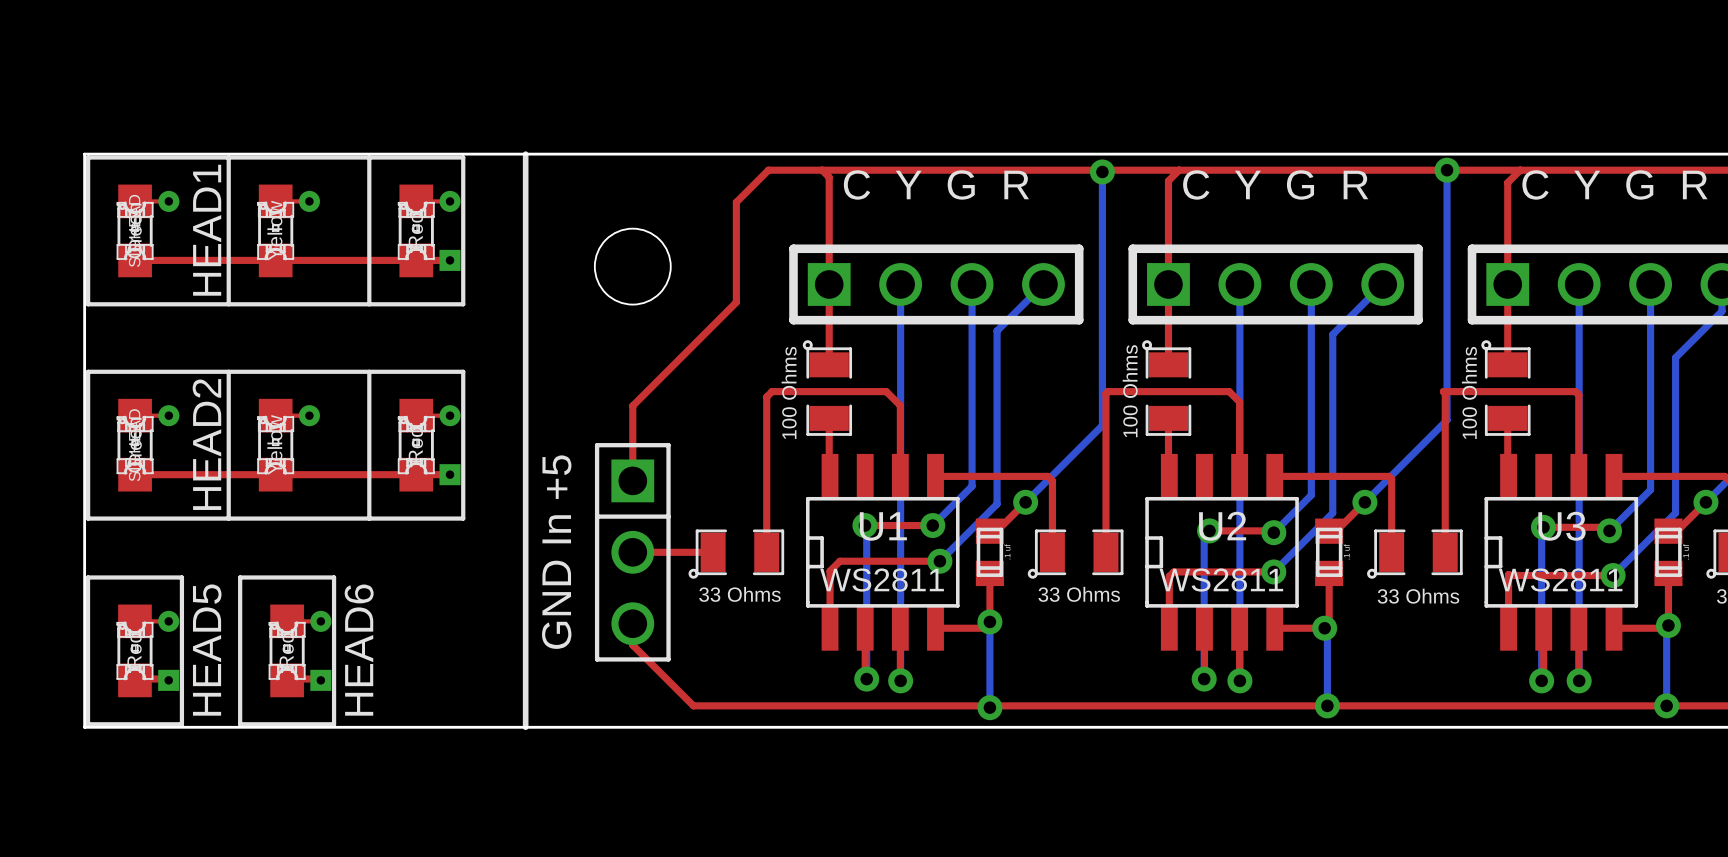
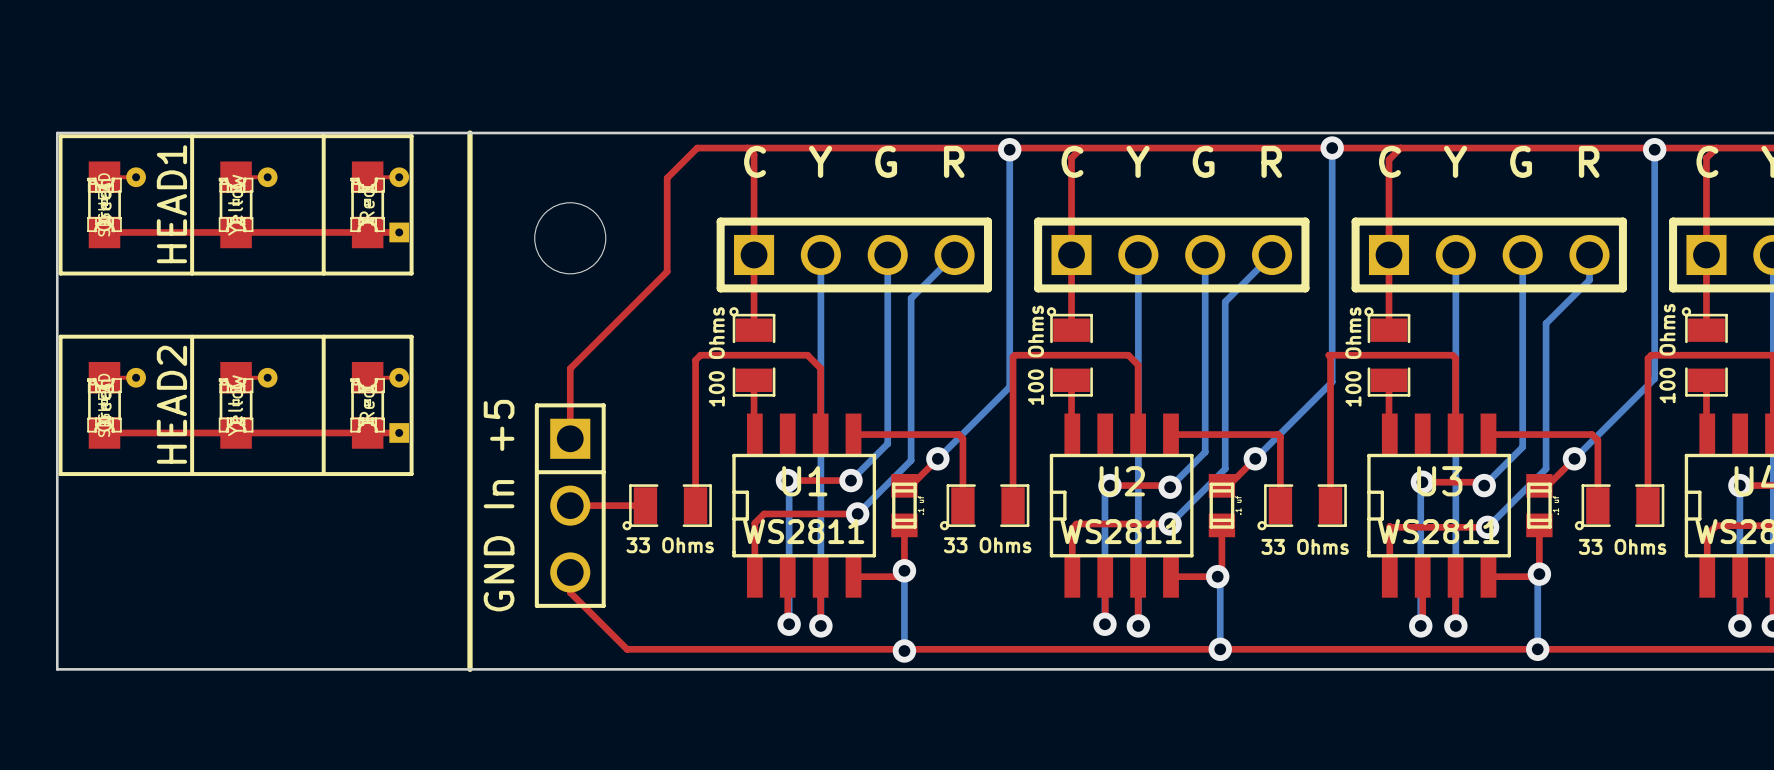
HEAD5: (134, 650) -> none
HEAD6: (287, 650) -> none

